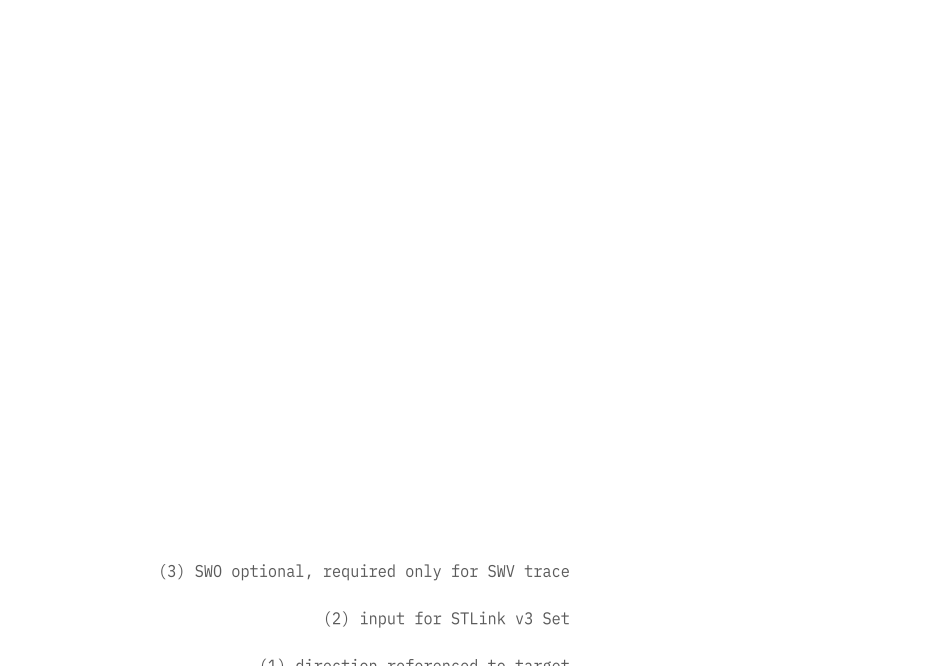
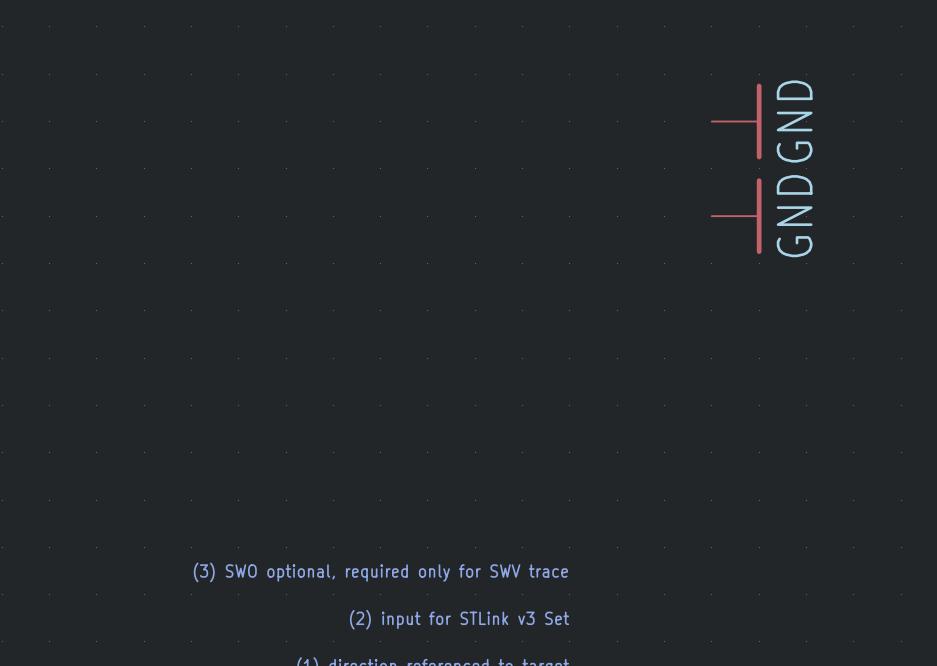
power symbol: none -> GND (736, 121)
power symbol: none -> GND (736, 216)

